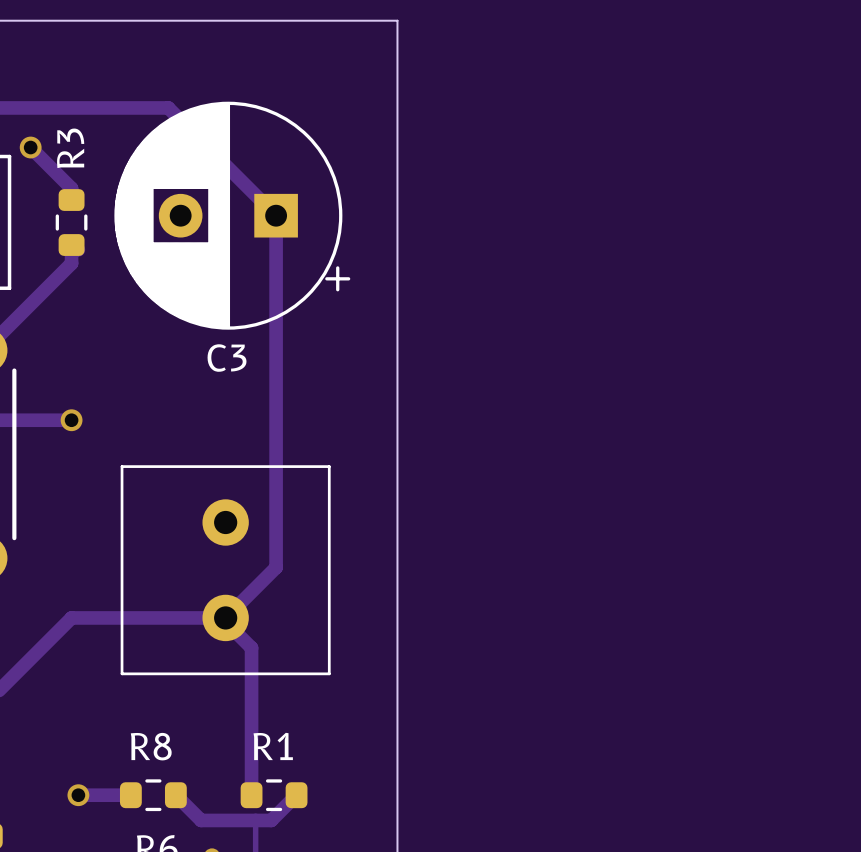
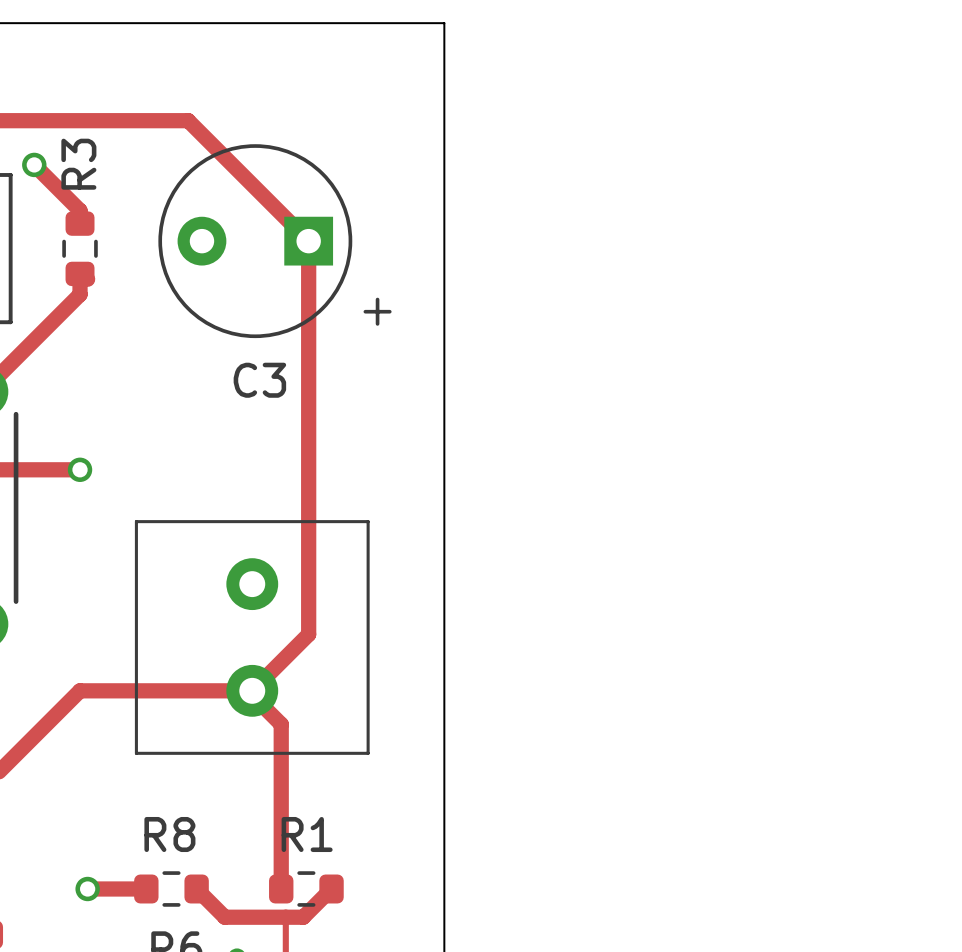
C3 footprint: [114, 101, 351, 330] -> [158, 144, 392, 339]

